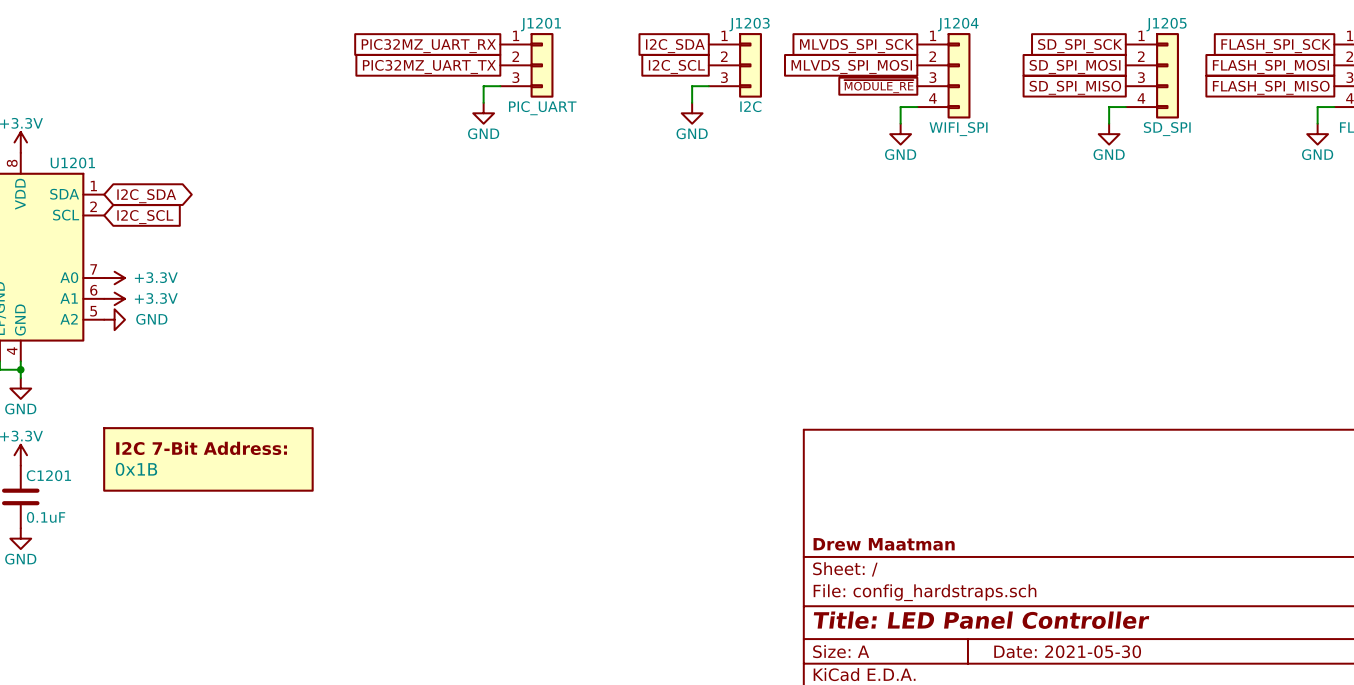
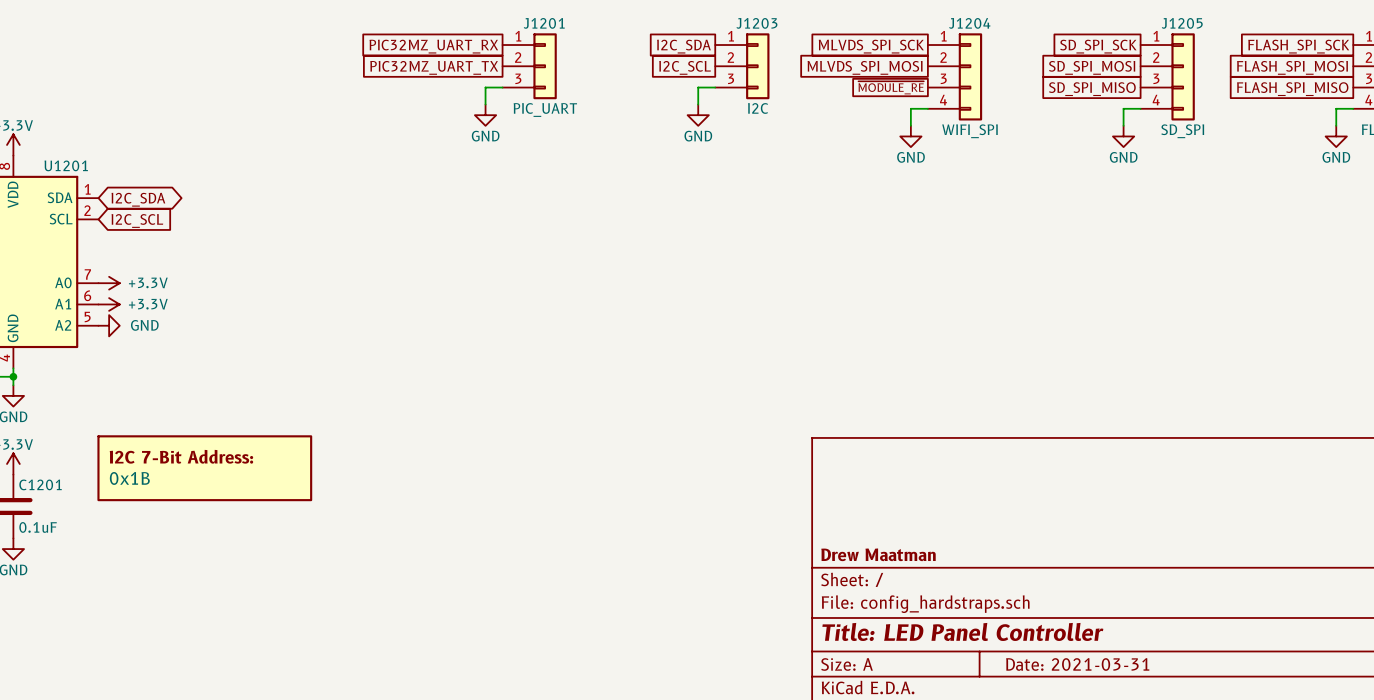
title block: Date: 2021-05-30 (1067, 651) -> Date: 2021-03-31 (1077, 664)

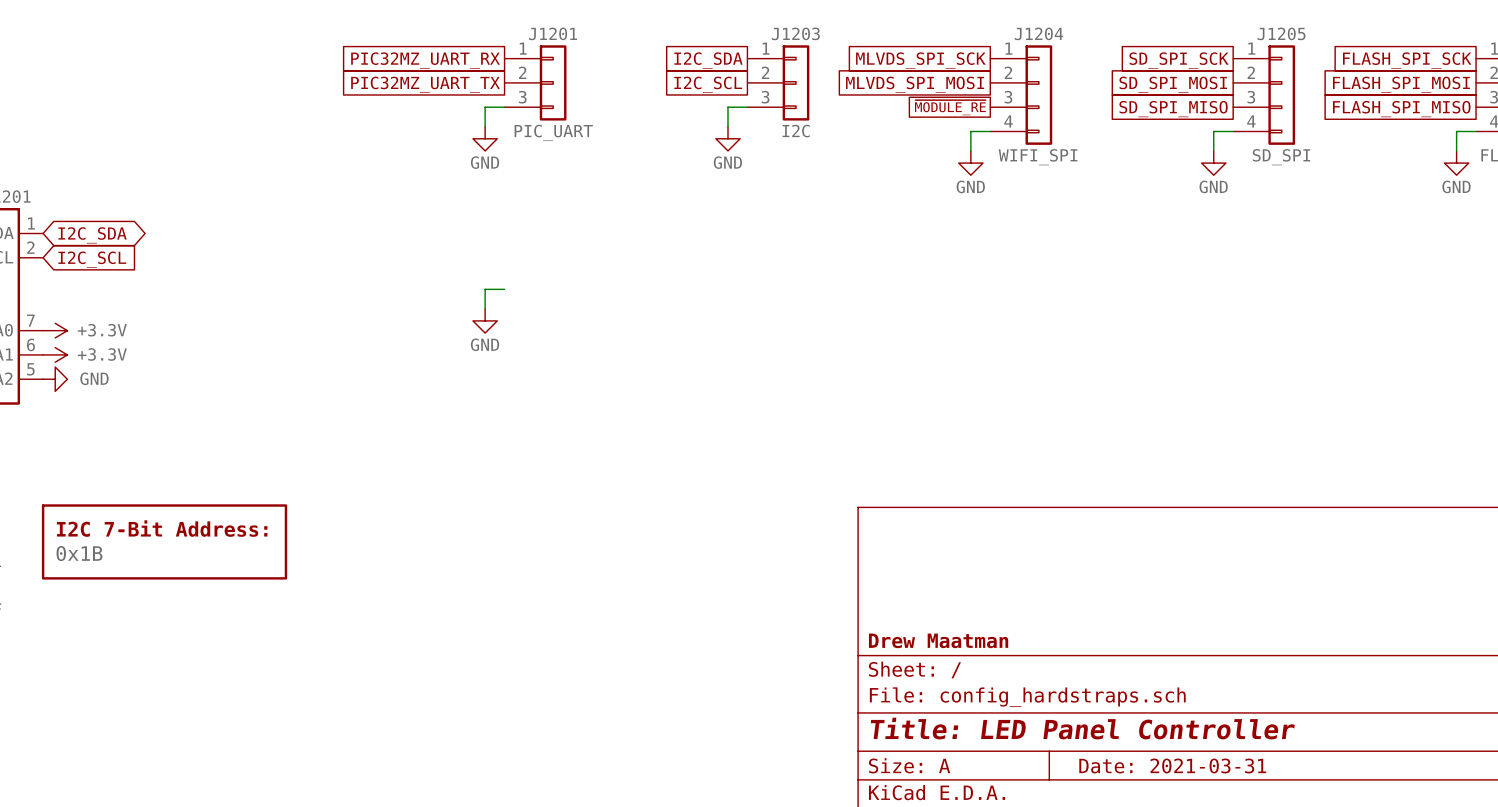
wire: none -> (504, 289) (485, 289) (485, 308)
power symbol: none -> GND (485, 320)

